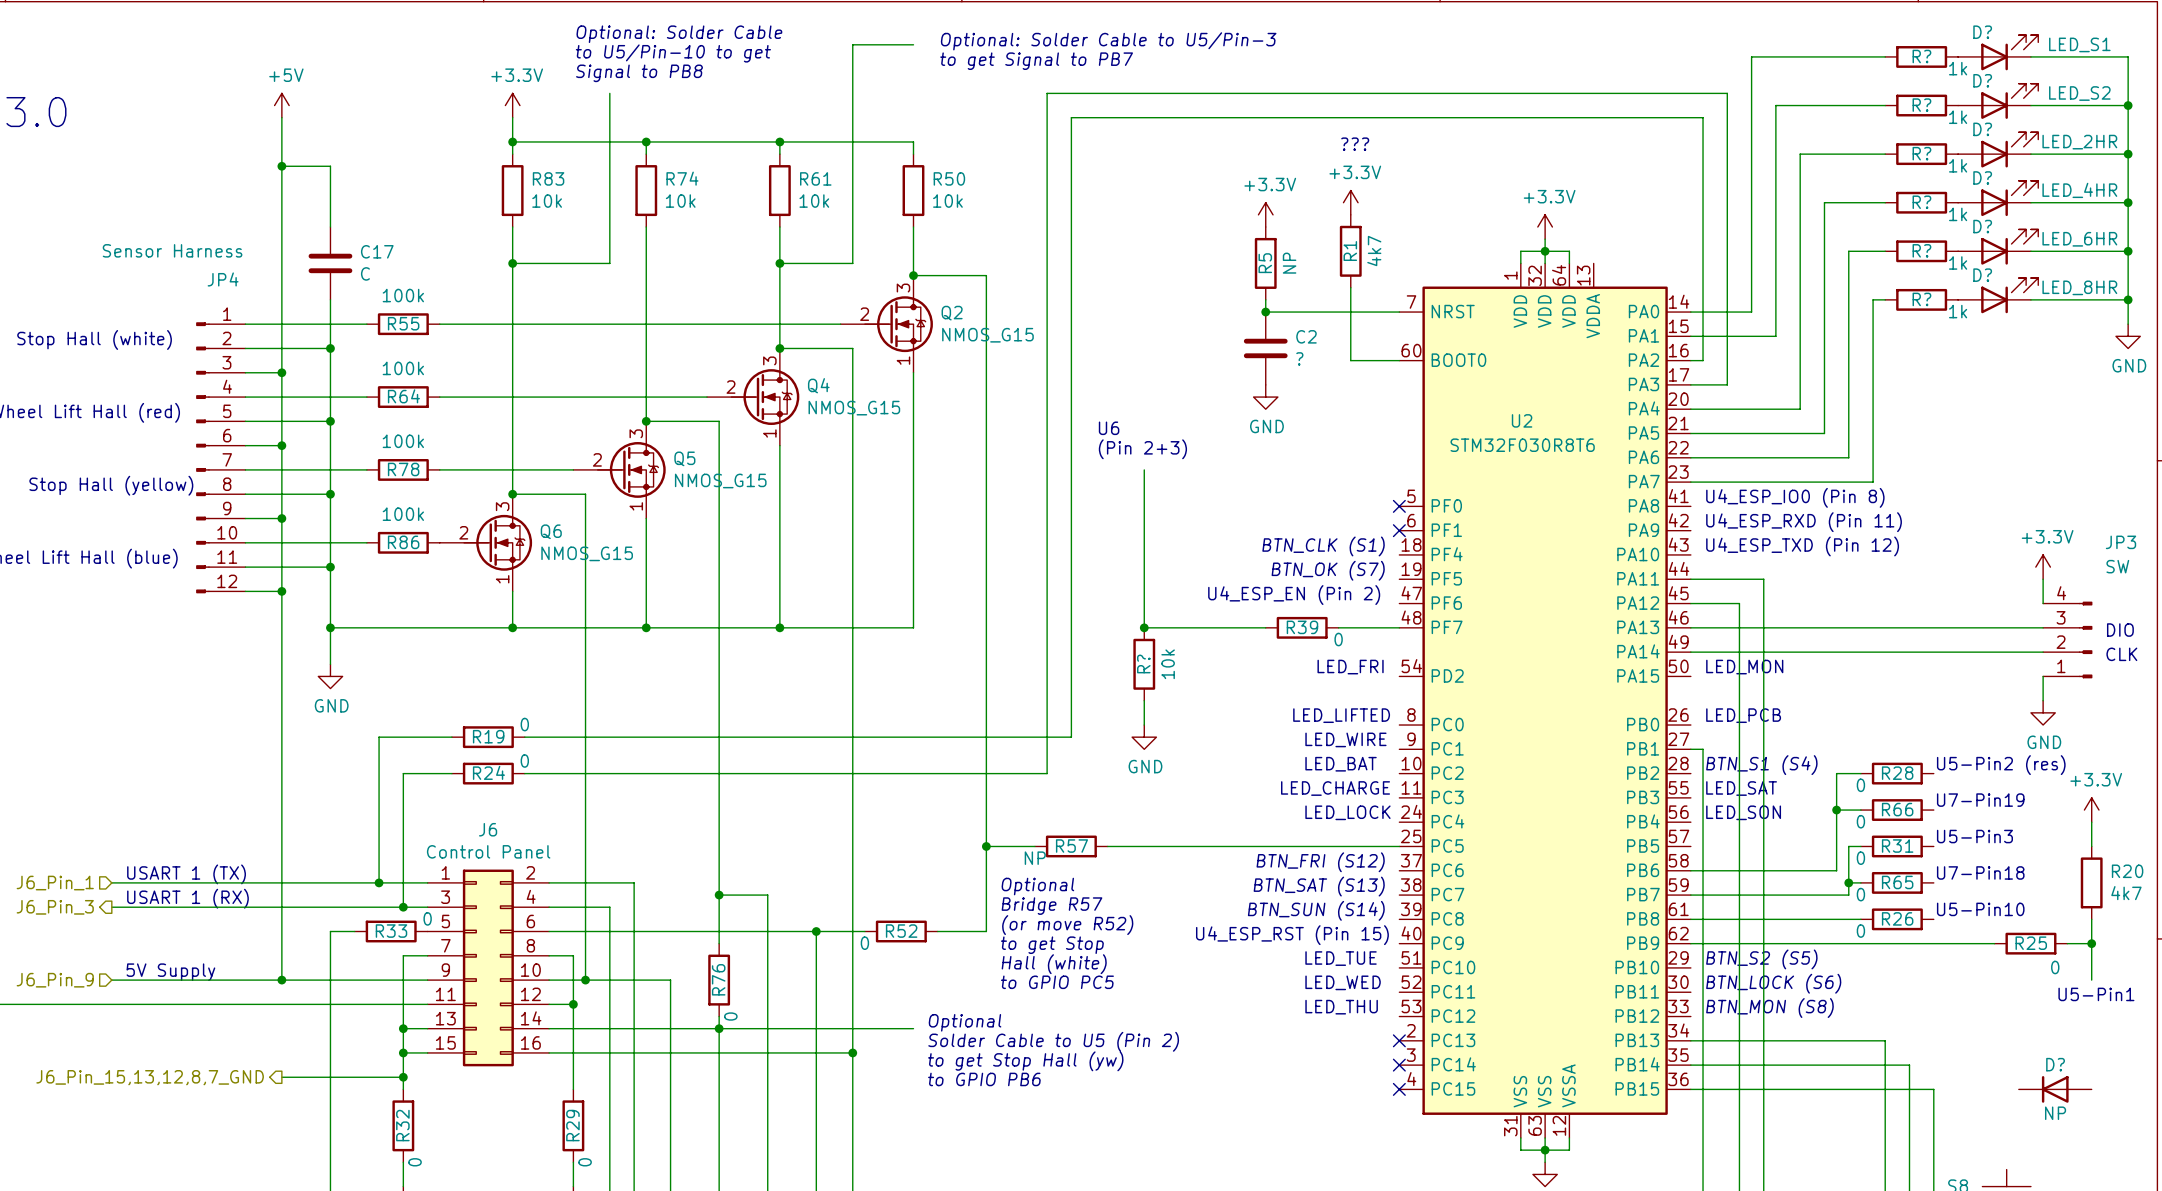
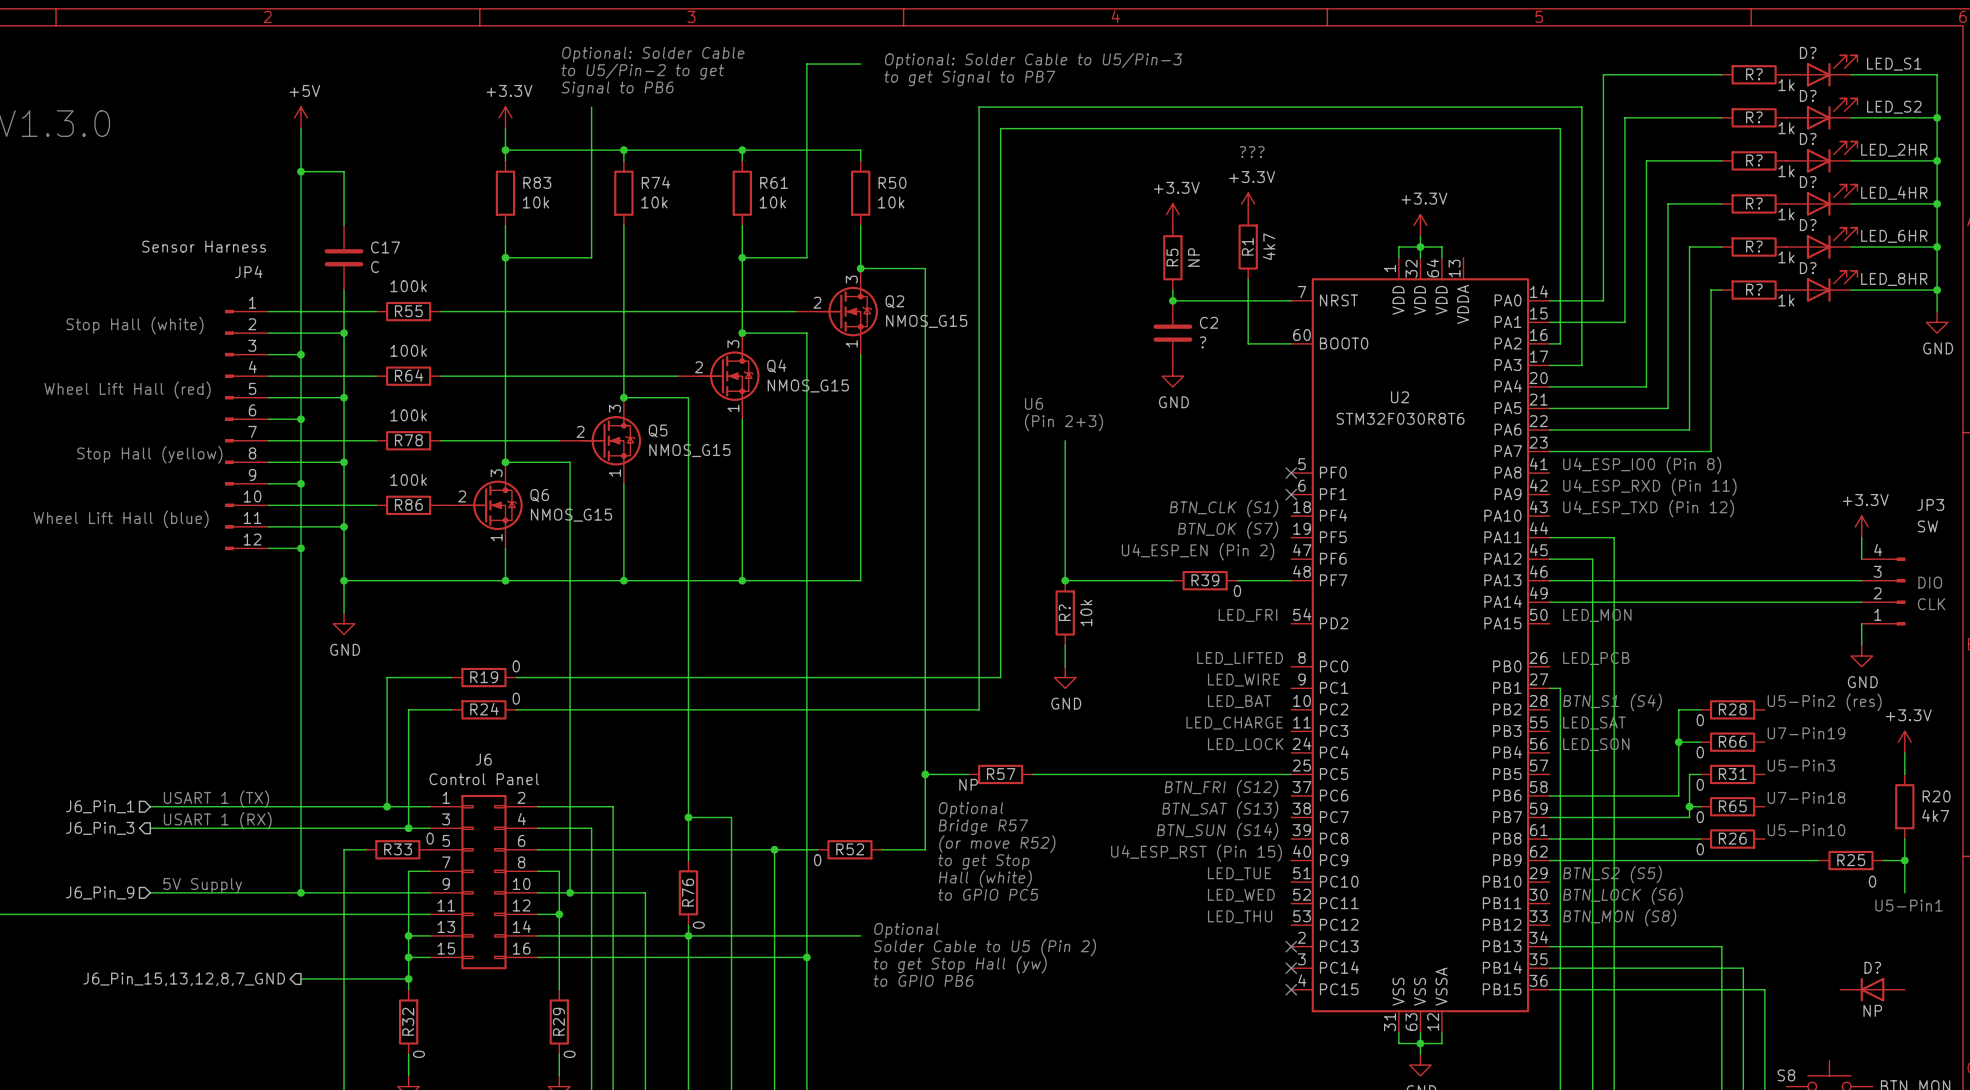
text: to U5/Pin-10 to get (673, 53) -> to U5/Pin-2 to get (642, 71)
text: Signal to PB8 (639, 73) -> Signal to PB6 (617, 89)

